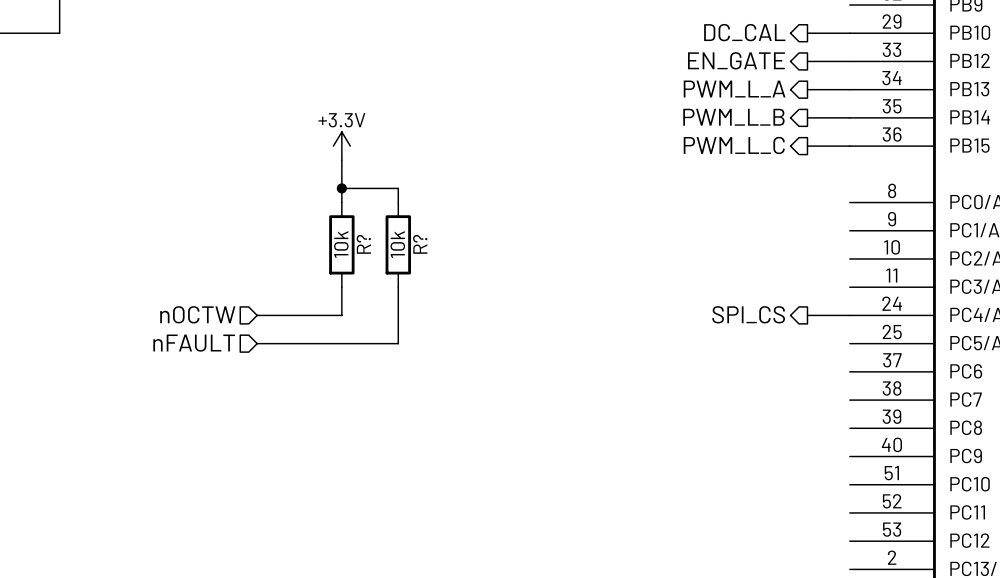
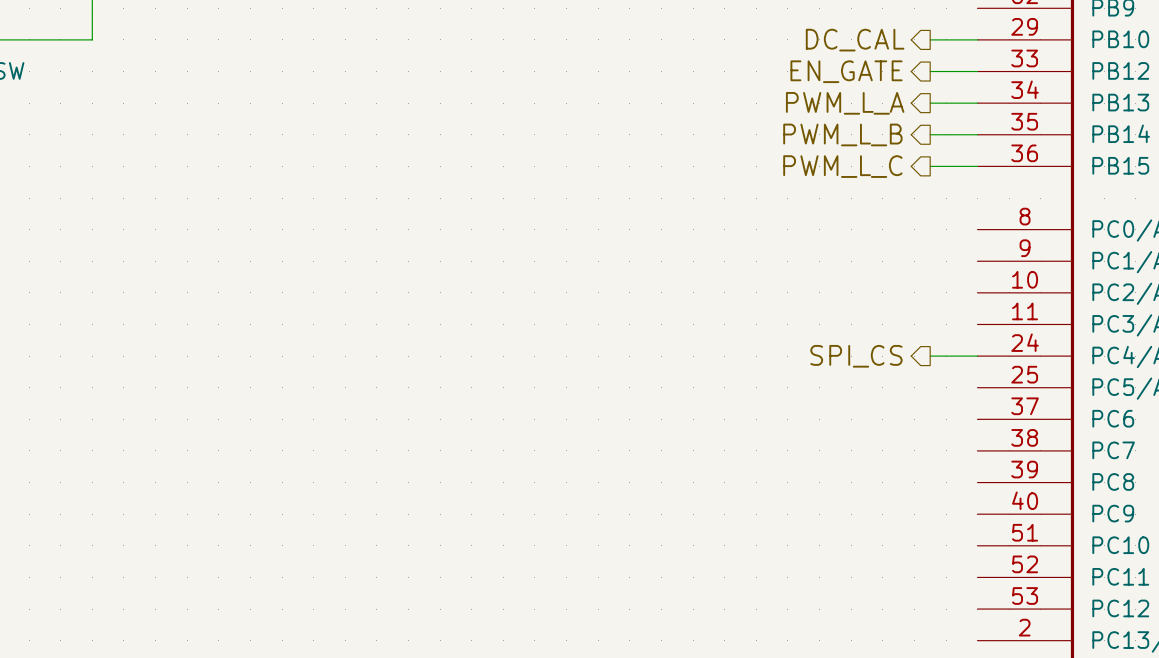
power symbol: +3.3V (341, 146) -> none
wire: (341, 160) (341, 202) -> none
wire: (341, 188) (398, 188) (398, 202) -> none
junction: (341, 188) -> none
R?: 10k (341, 244) -> none
R?: 10k (398, 244) -> none
wire: (341, 287) (341, 315) (257, 315) -> none
wire: (398, 287) (398, 343) (257, 343) -> none
hierarchical label: nOCTW (197, 314) -> none
hierarchical label: nFAULT (194, 343) -> none

